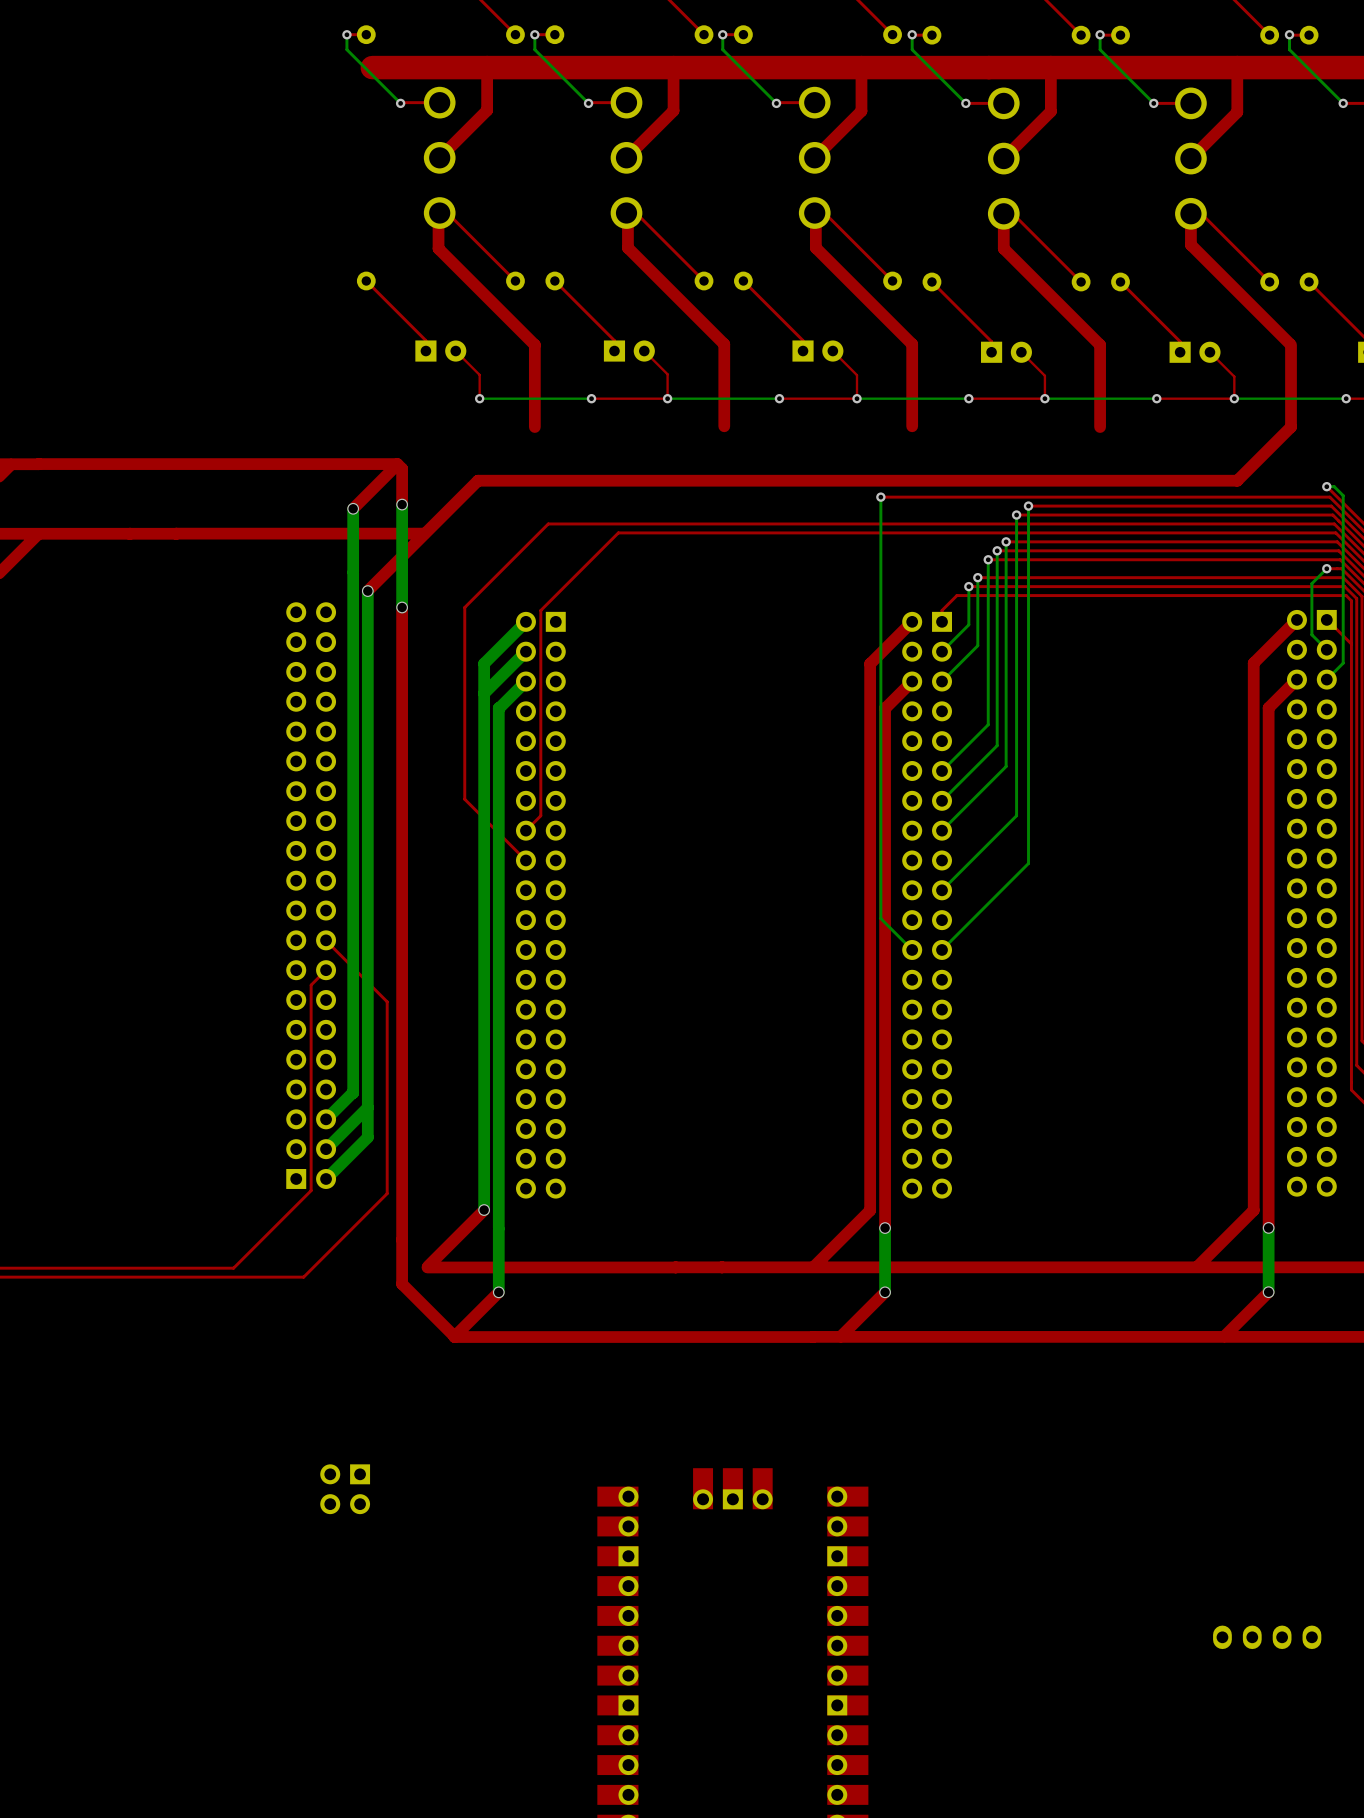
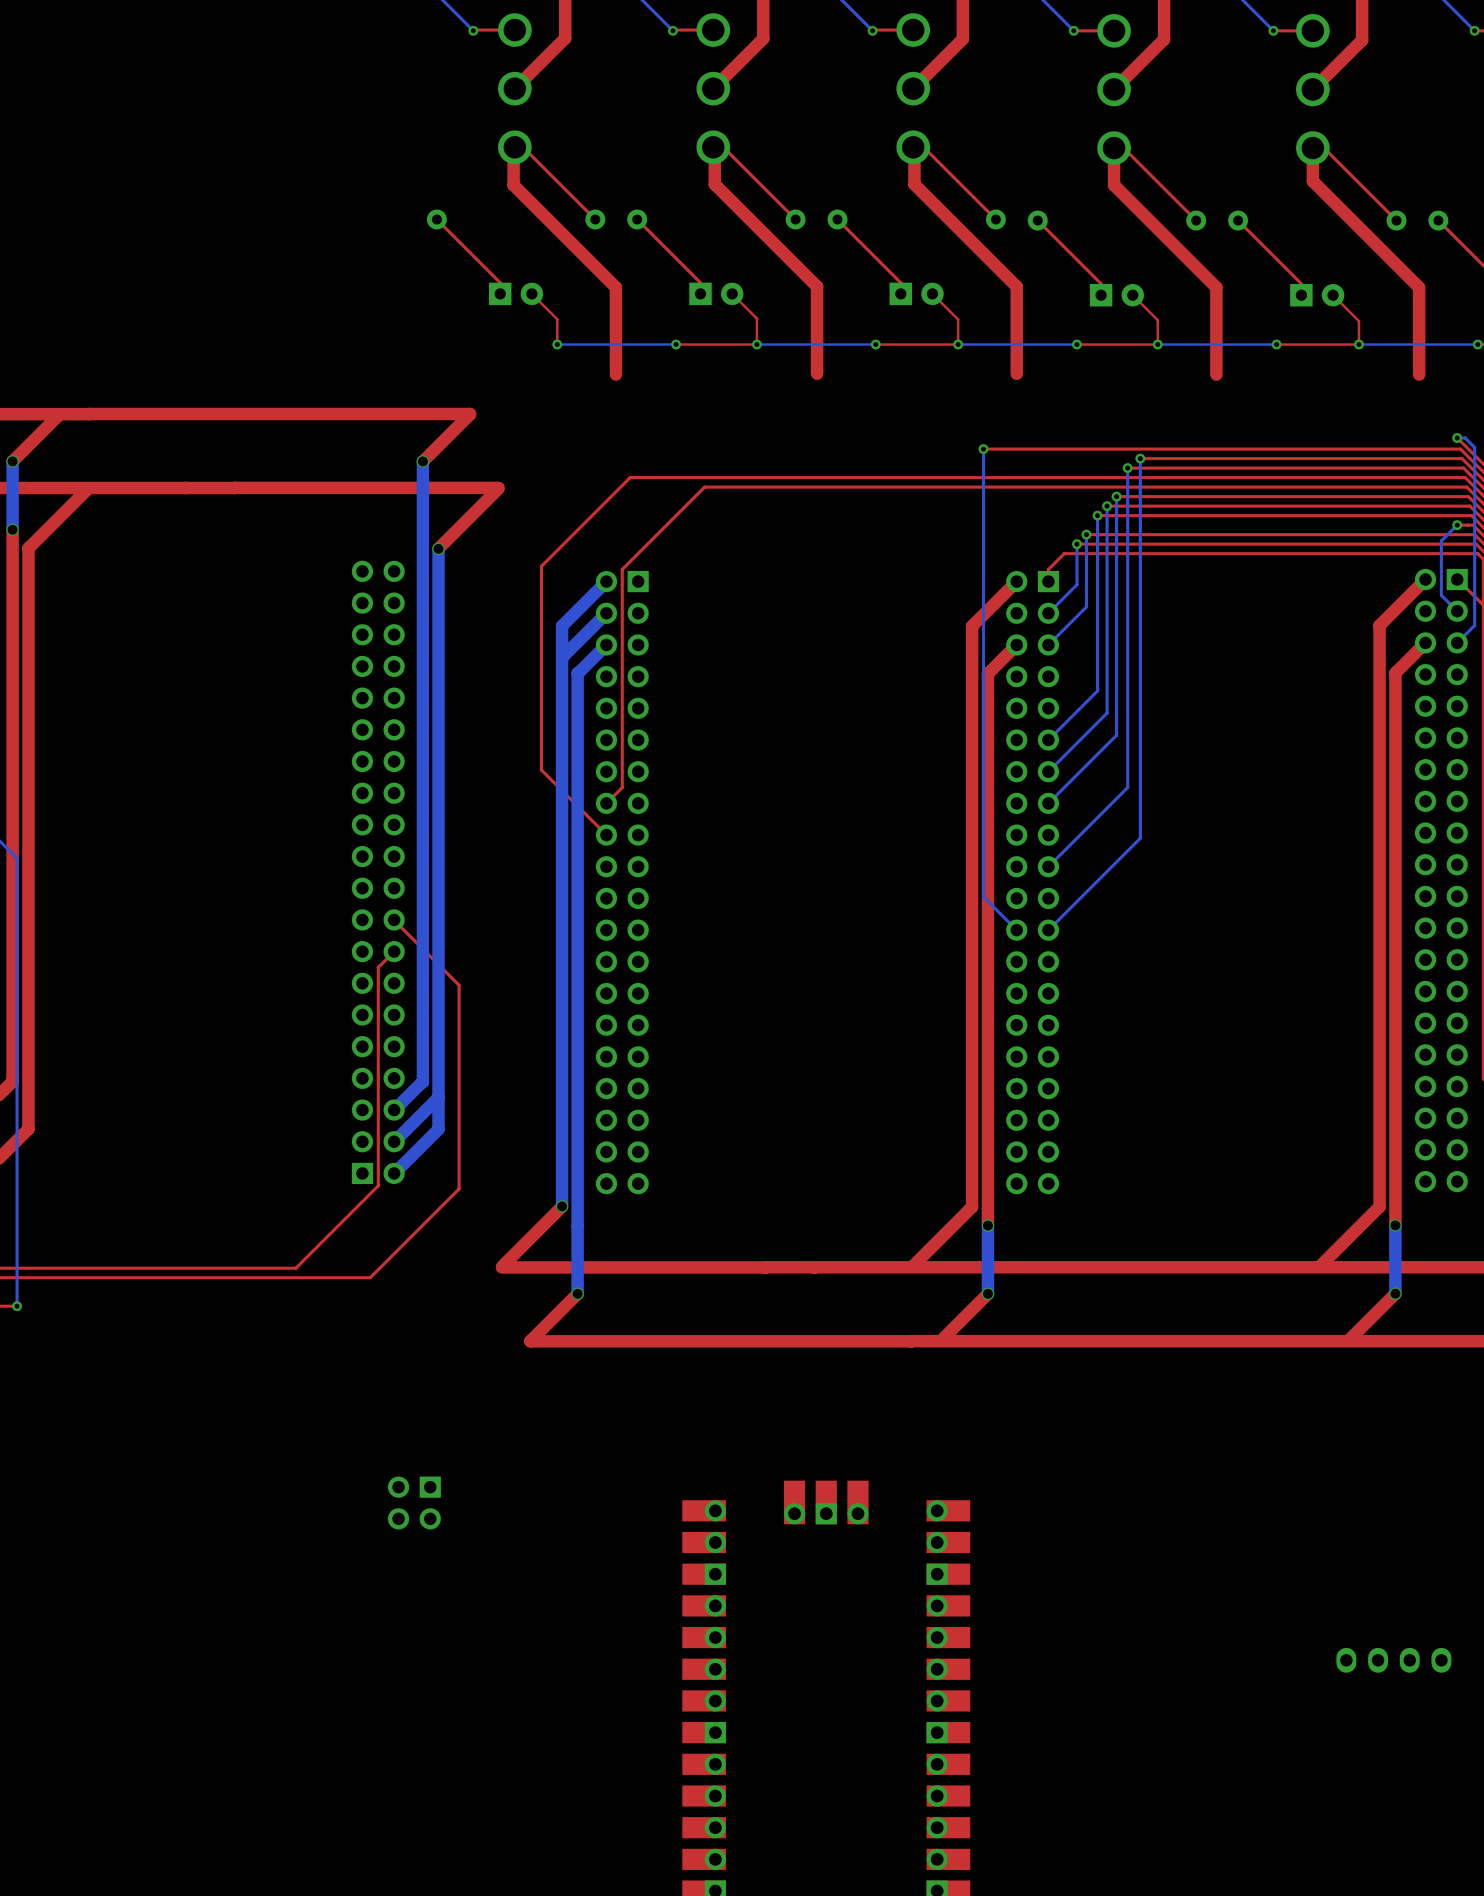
top track: (1291, 427) (1237, 480) (477, 480) (423, 534) -> none
top track: (397, 464) (402, 468) (402, 504) -> none
bottom track: (402, 504) (402, 607) -> none
via: (402, 504) -> none
top track: (402, 607) (402, 1284) (454, 1336) -> none
via: (402, 607) -> none

